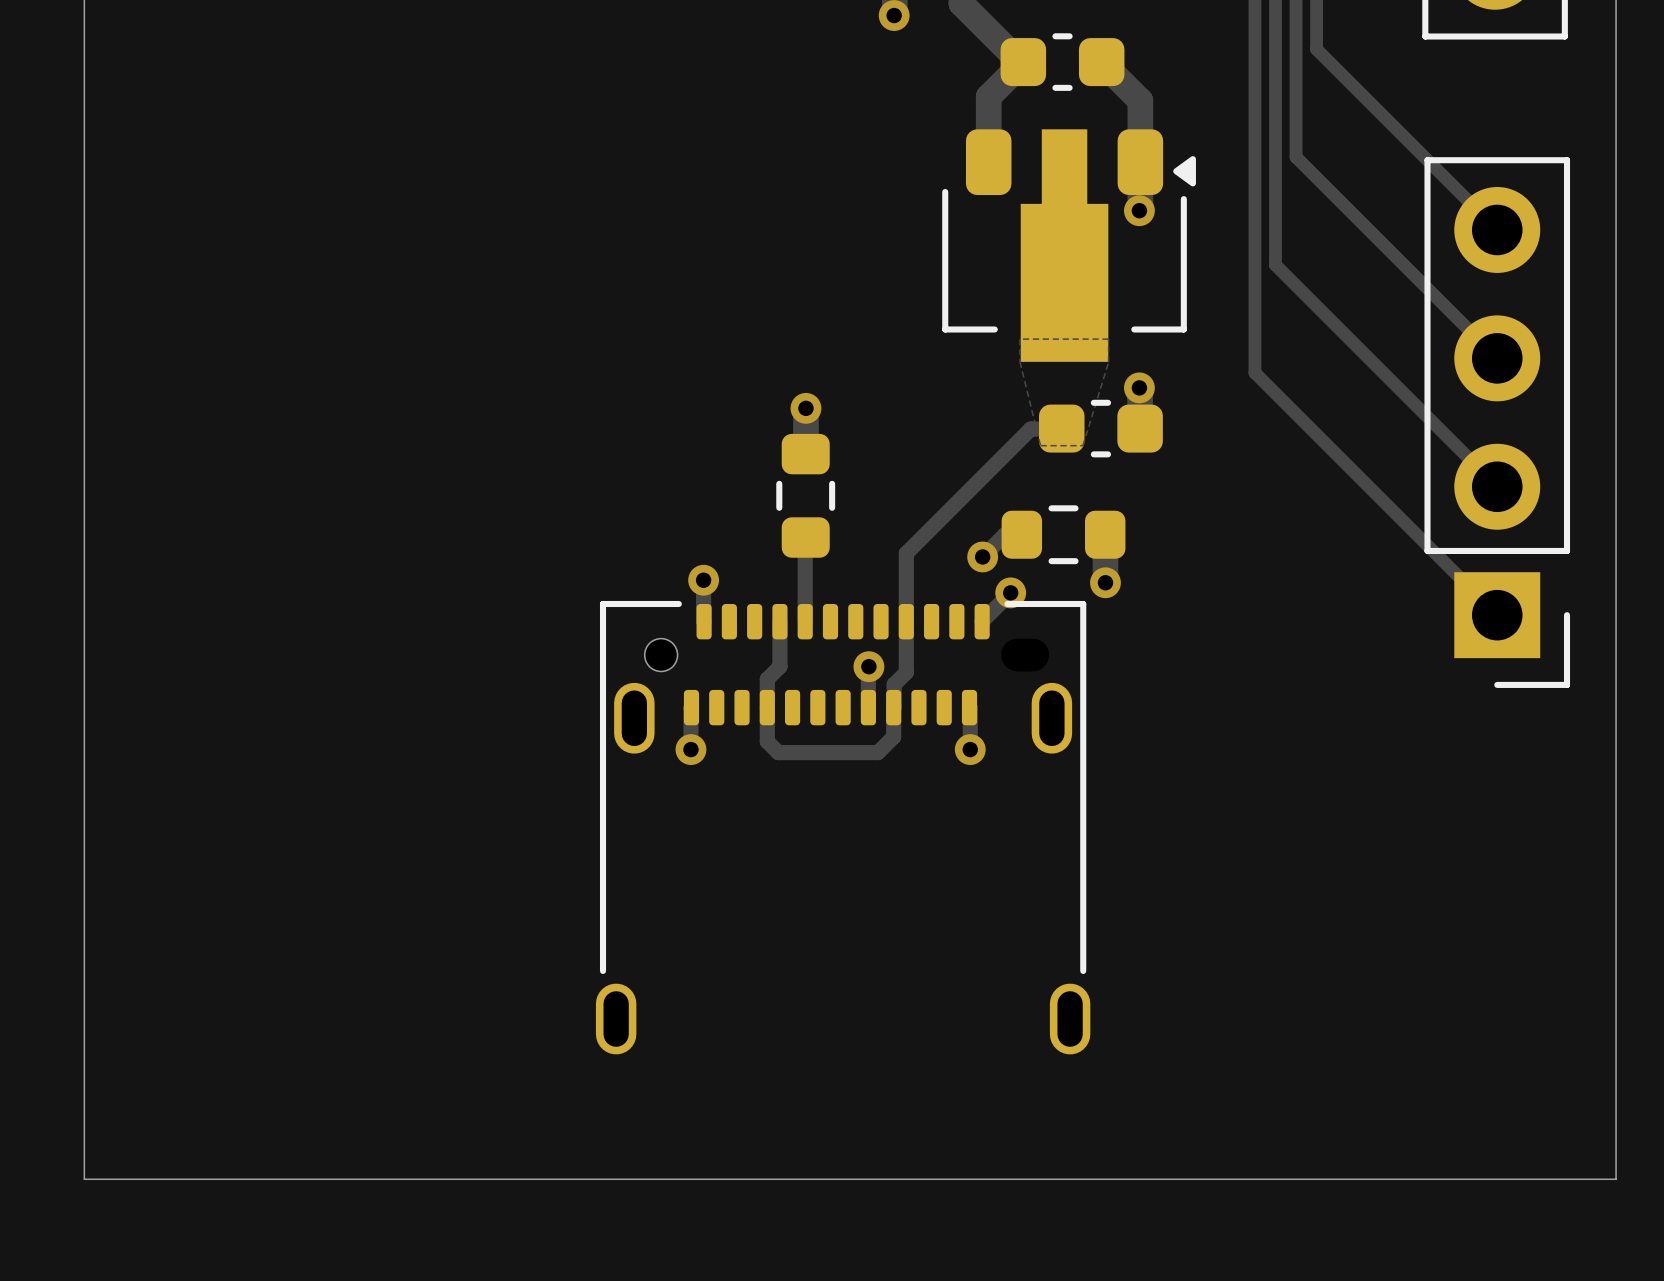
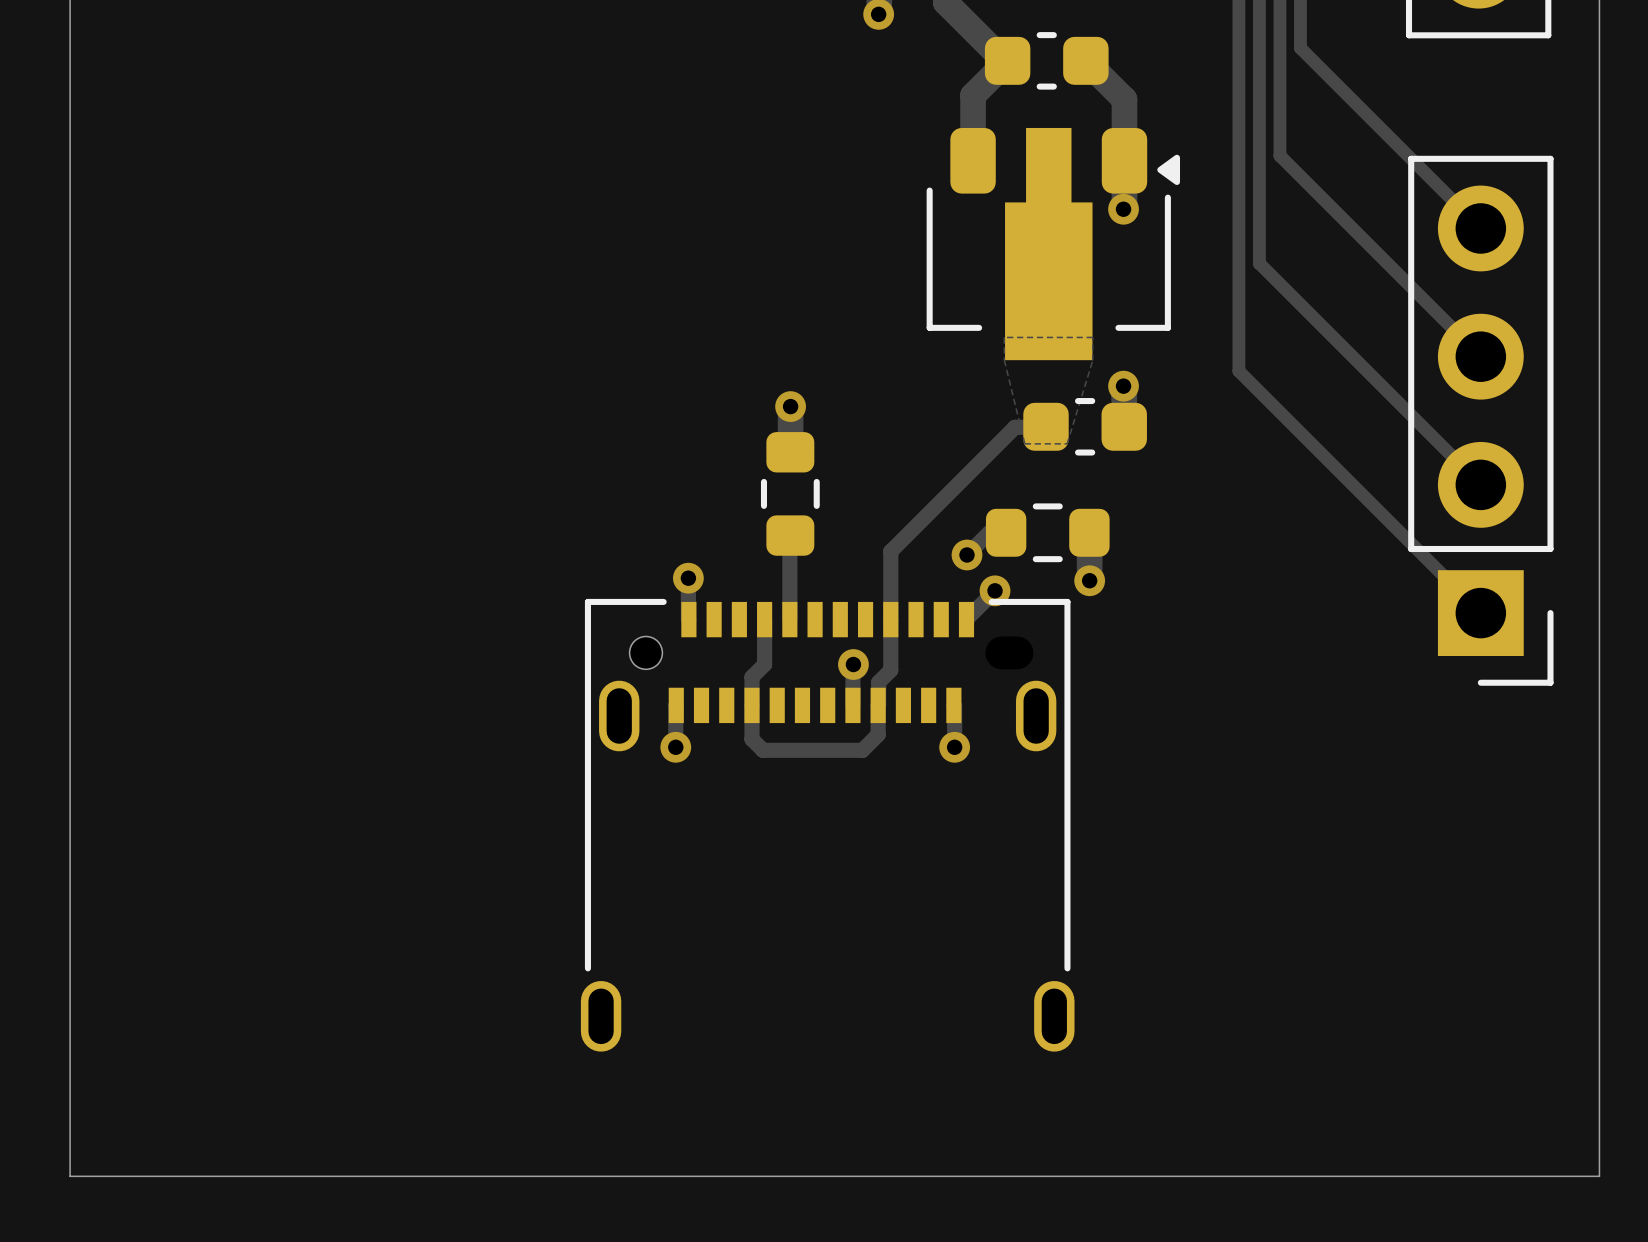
part footprint: [595, 600, 1091, 1055] -> [580, 598, 1075, 1052]

